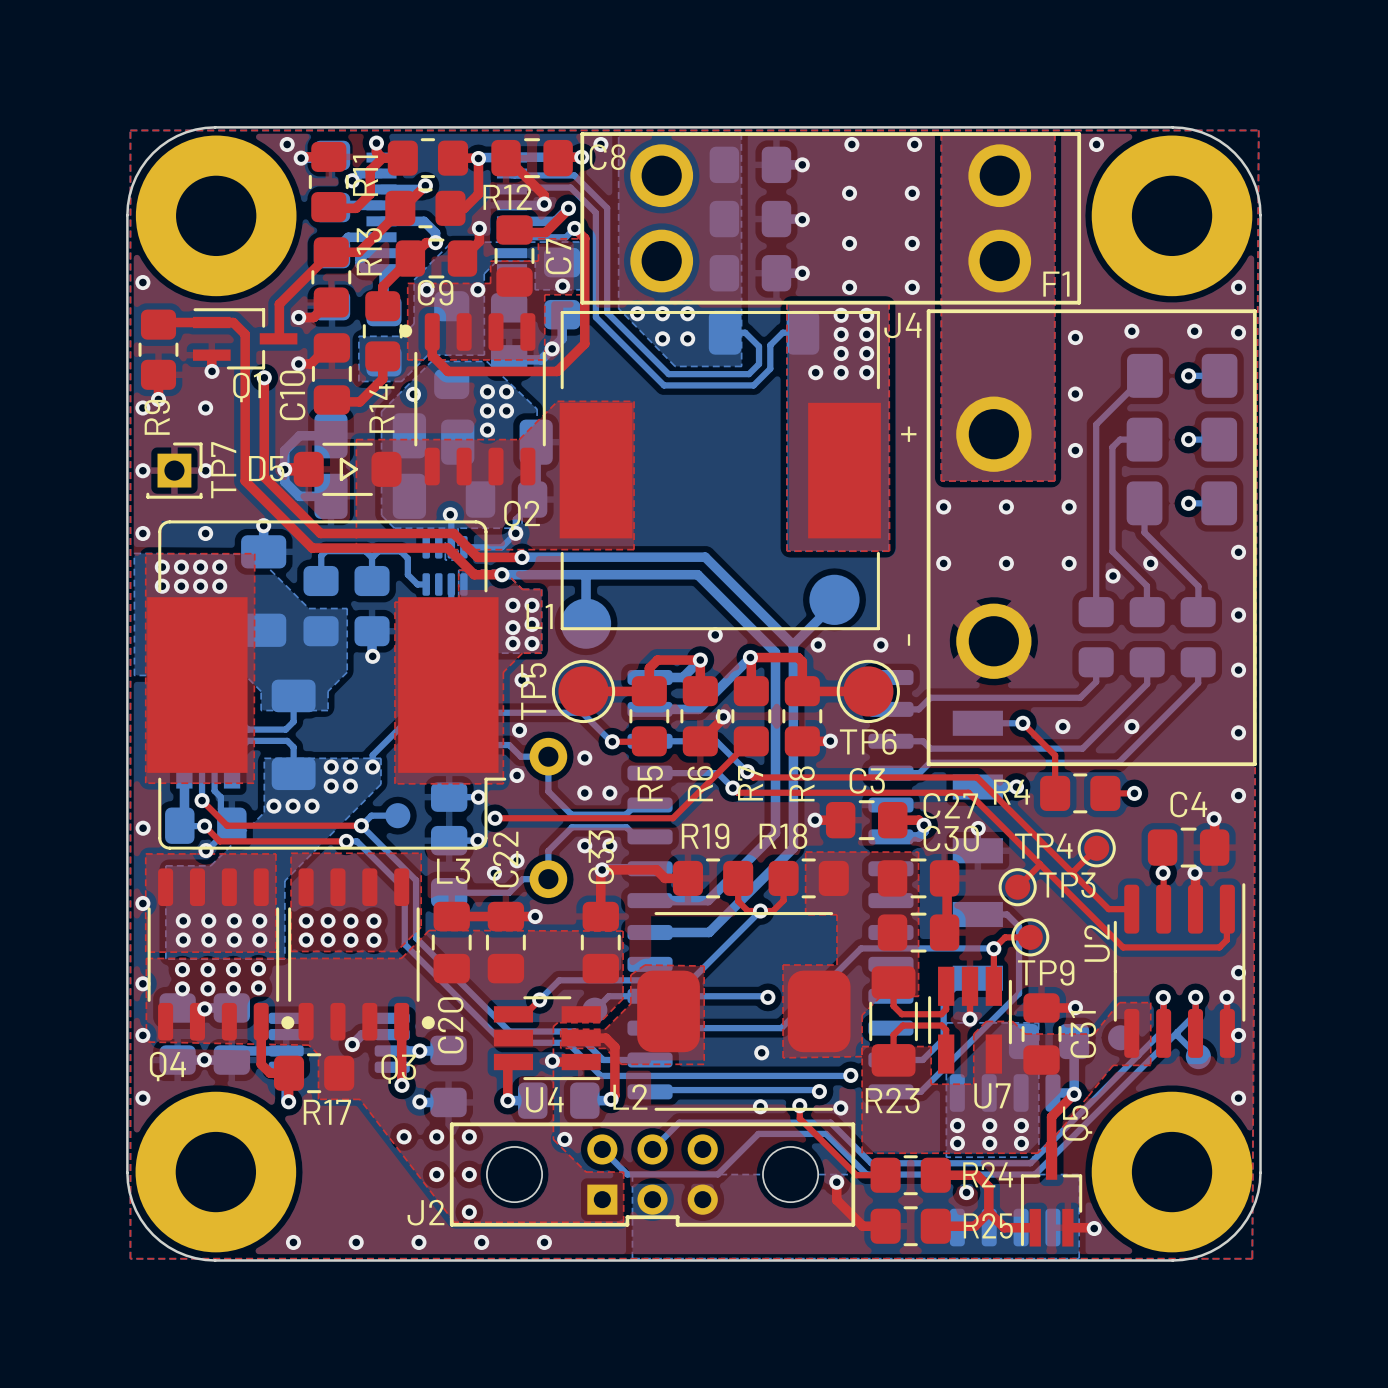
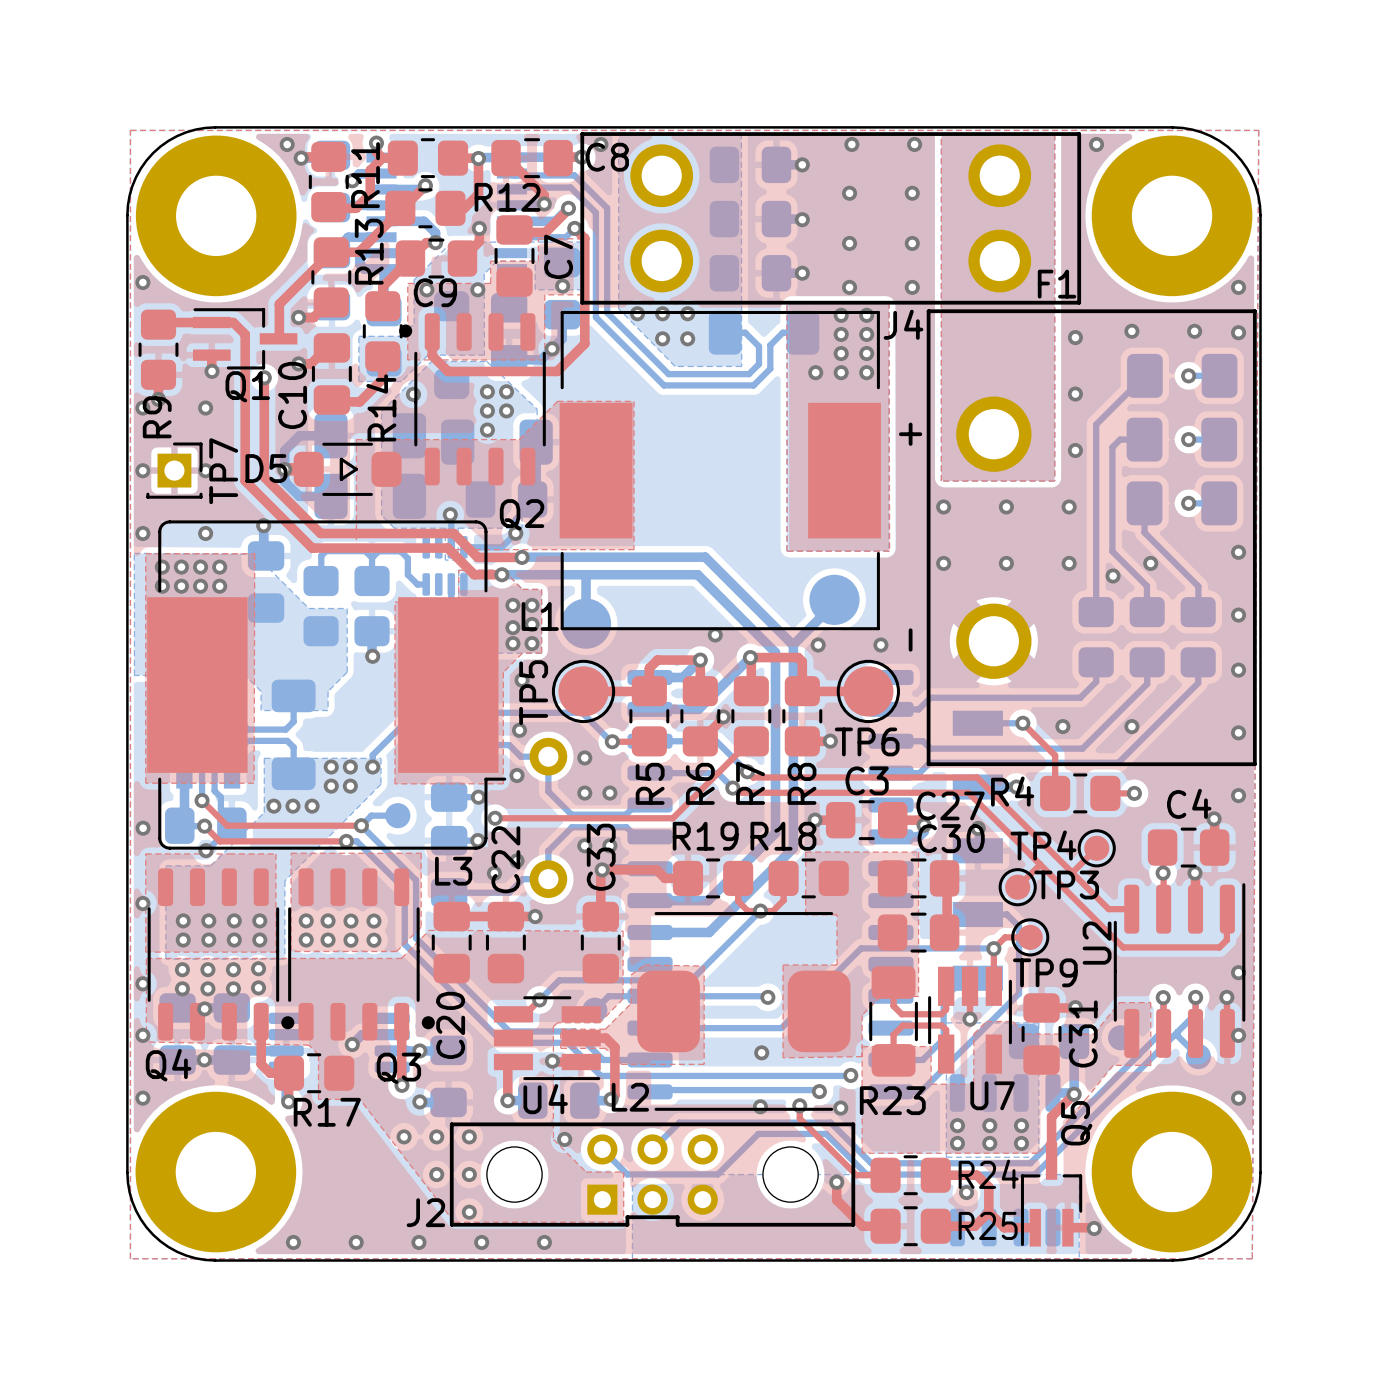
part footprint: [241, 535, 287, 647] -> [247, 541, 285, 623]

